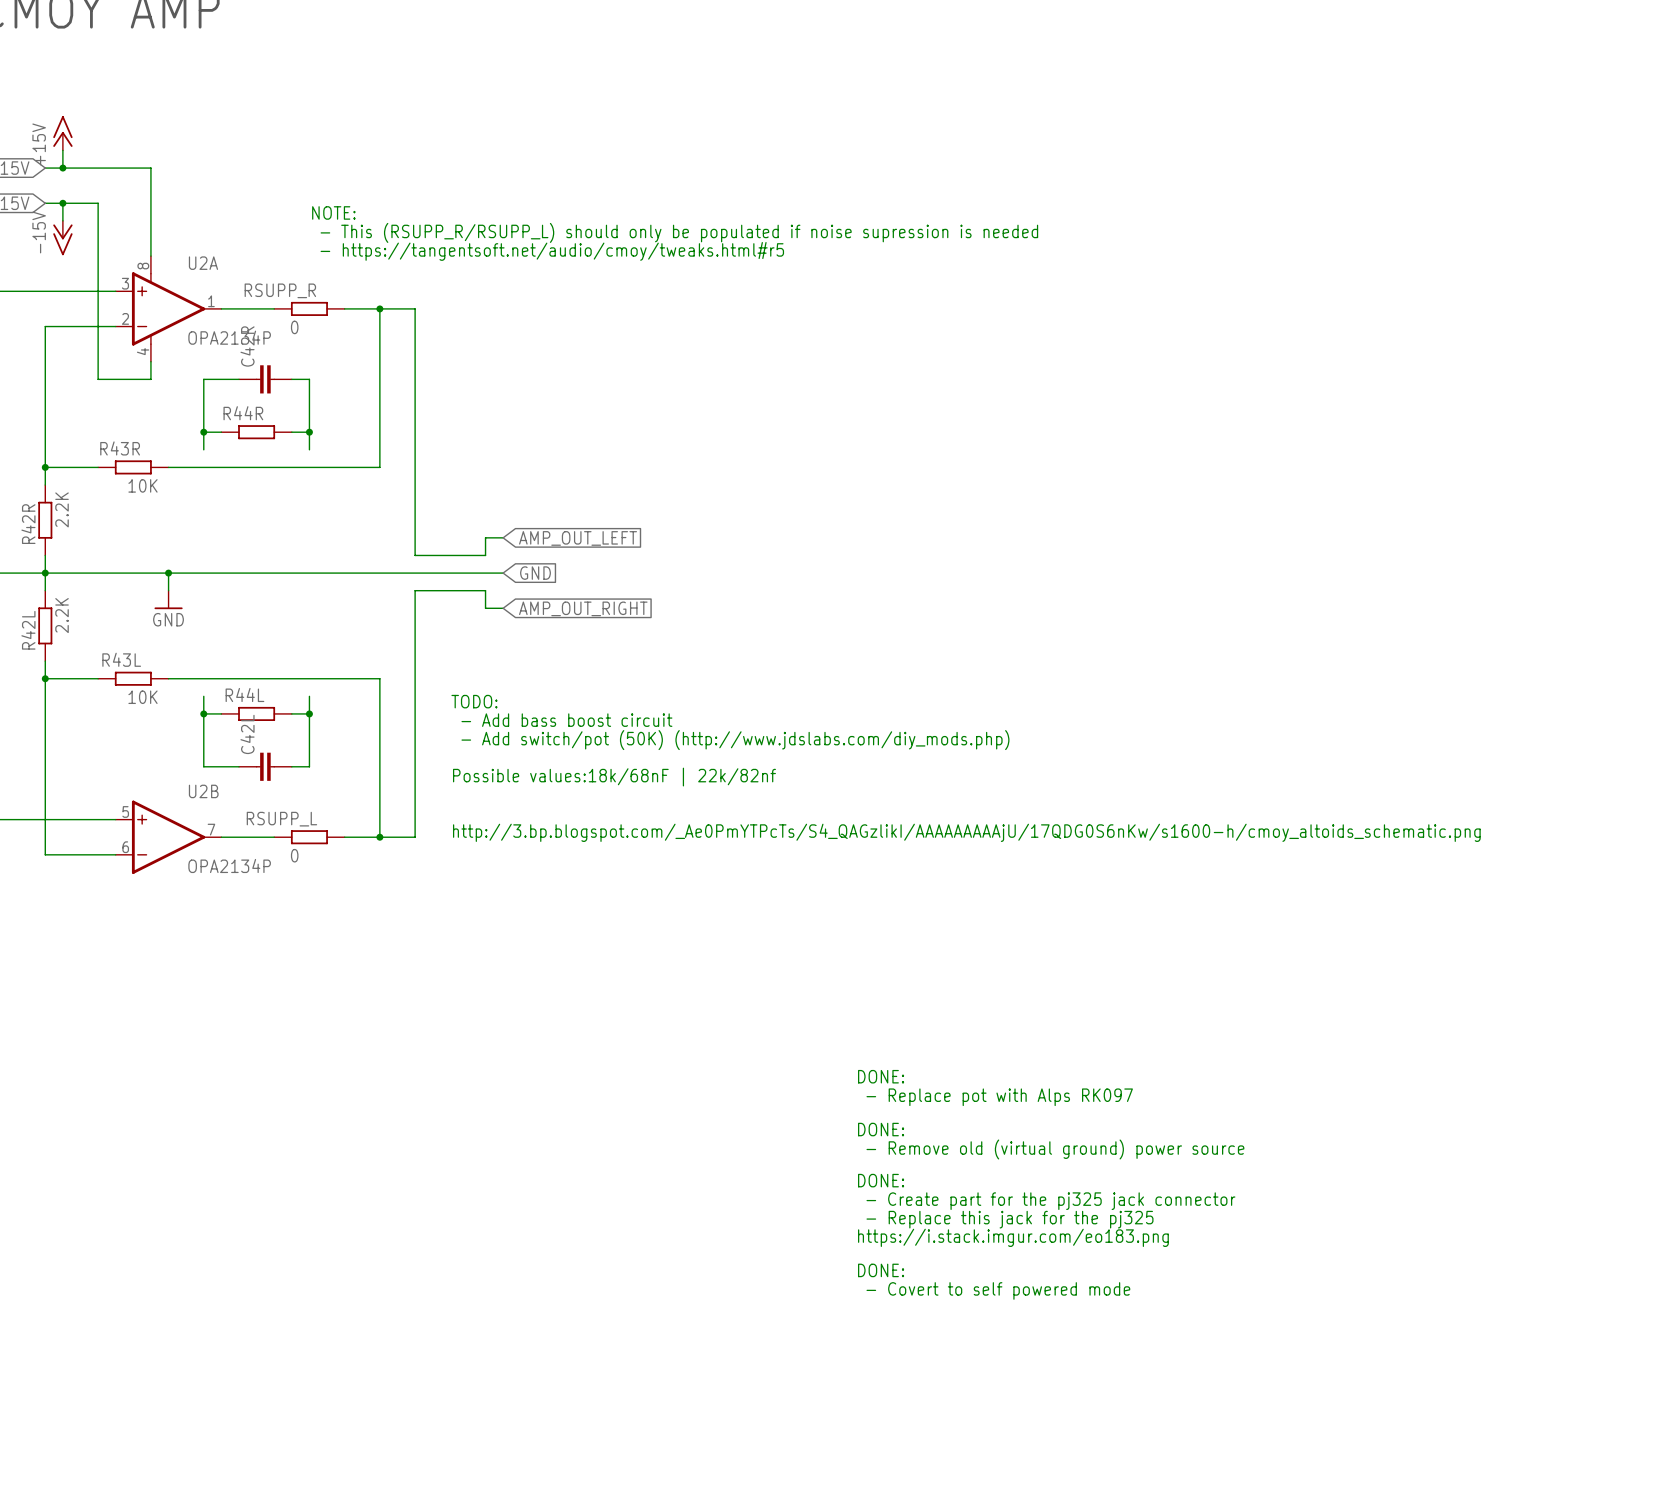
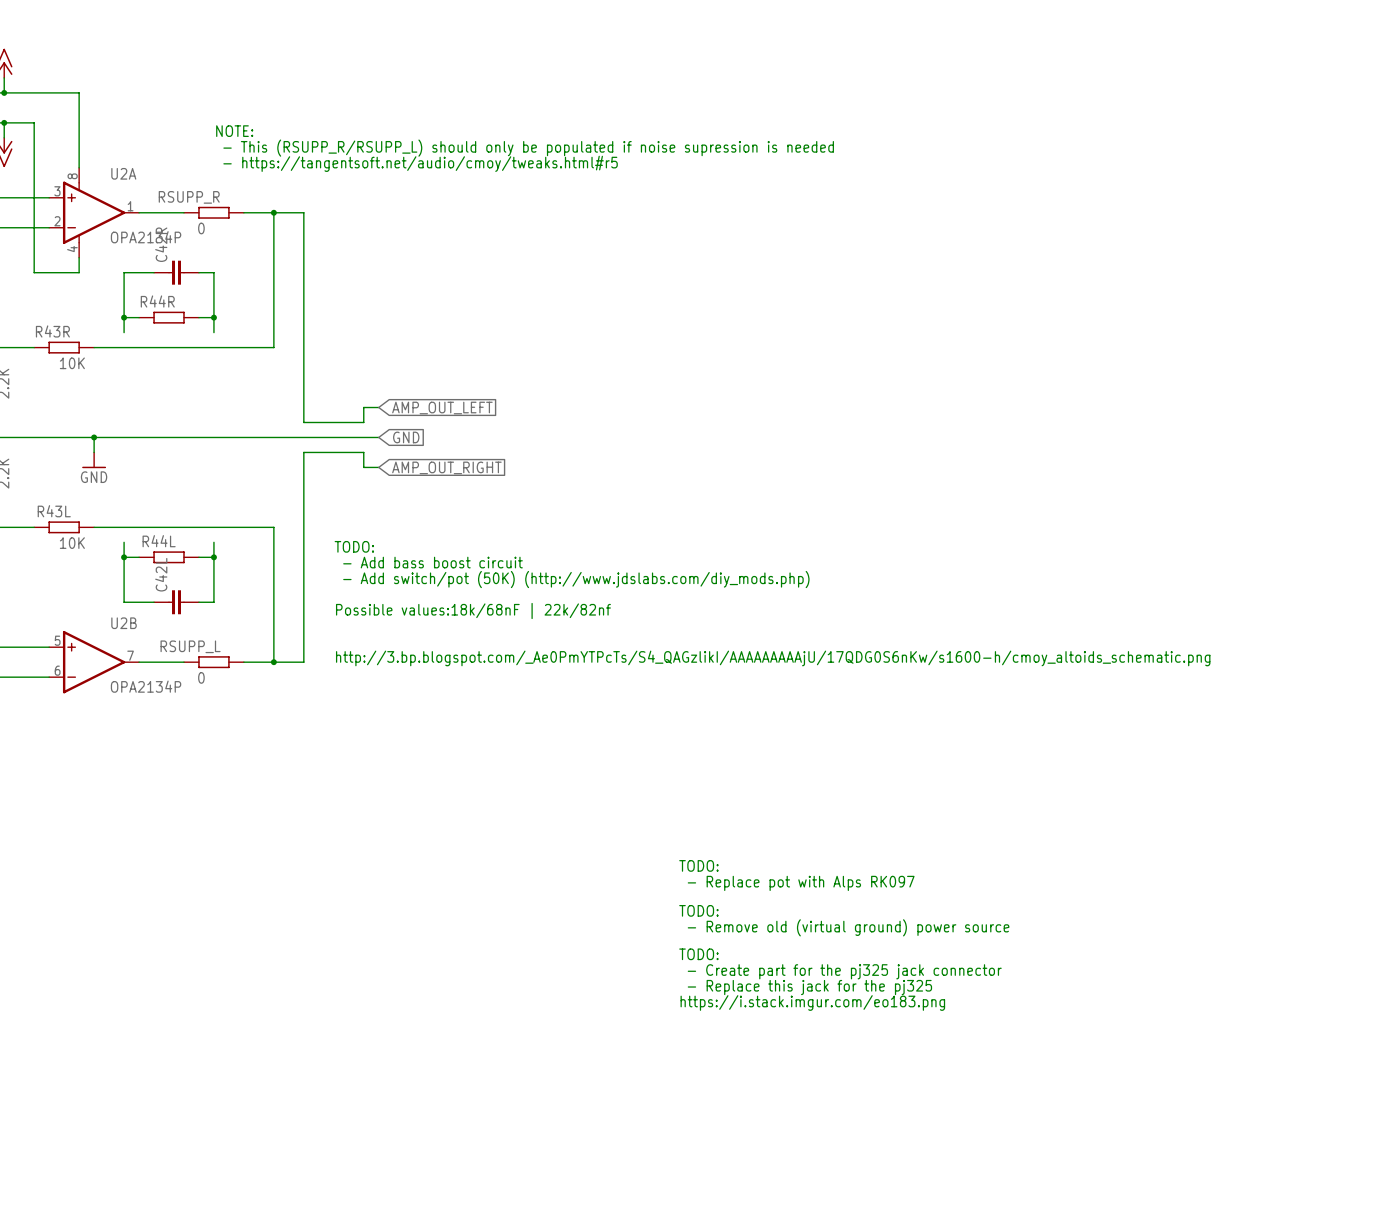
text: DONE: (881, 1076) -> TODO: (698, 865)
text: DONE: (881, 1129) -> TODO: (698, 910)
text: DONE: (881, 1180) -> TODO: (698, 954)
text: DONE: (881, 1270) -> none
text: - Covert to self powered mode (998, 1290) -> none

